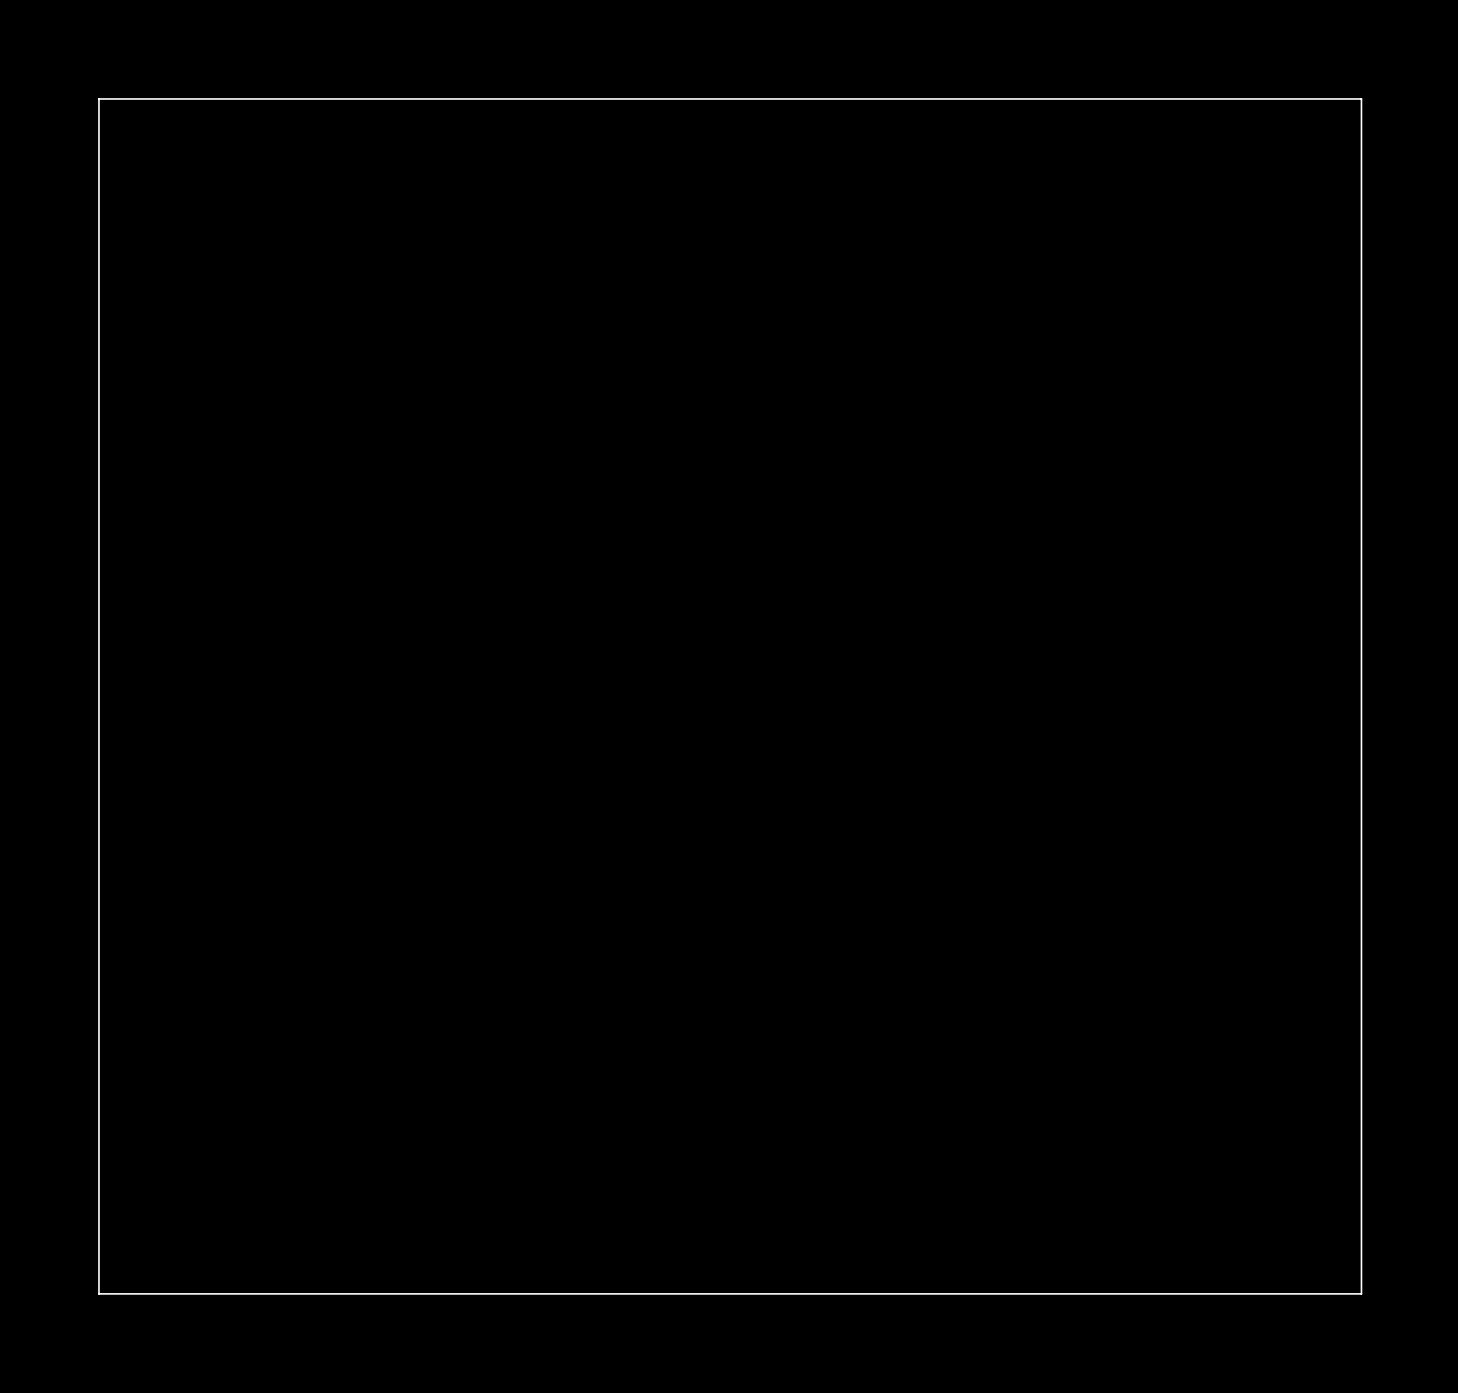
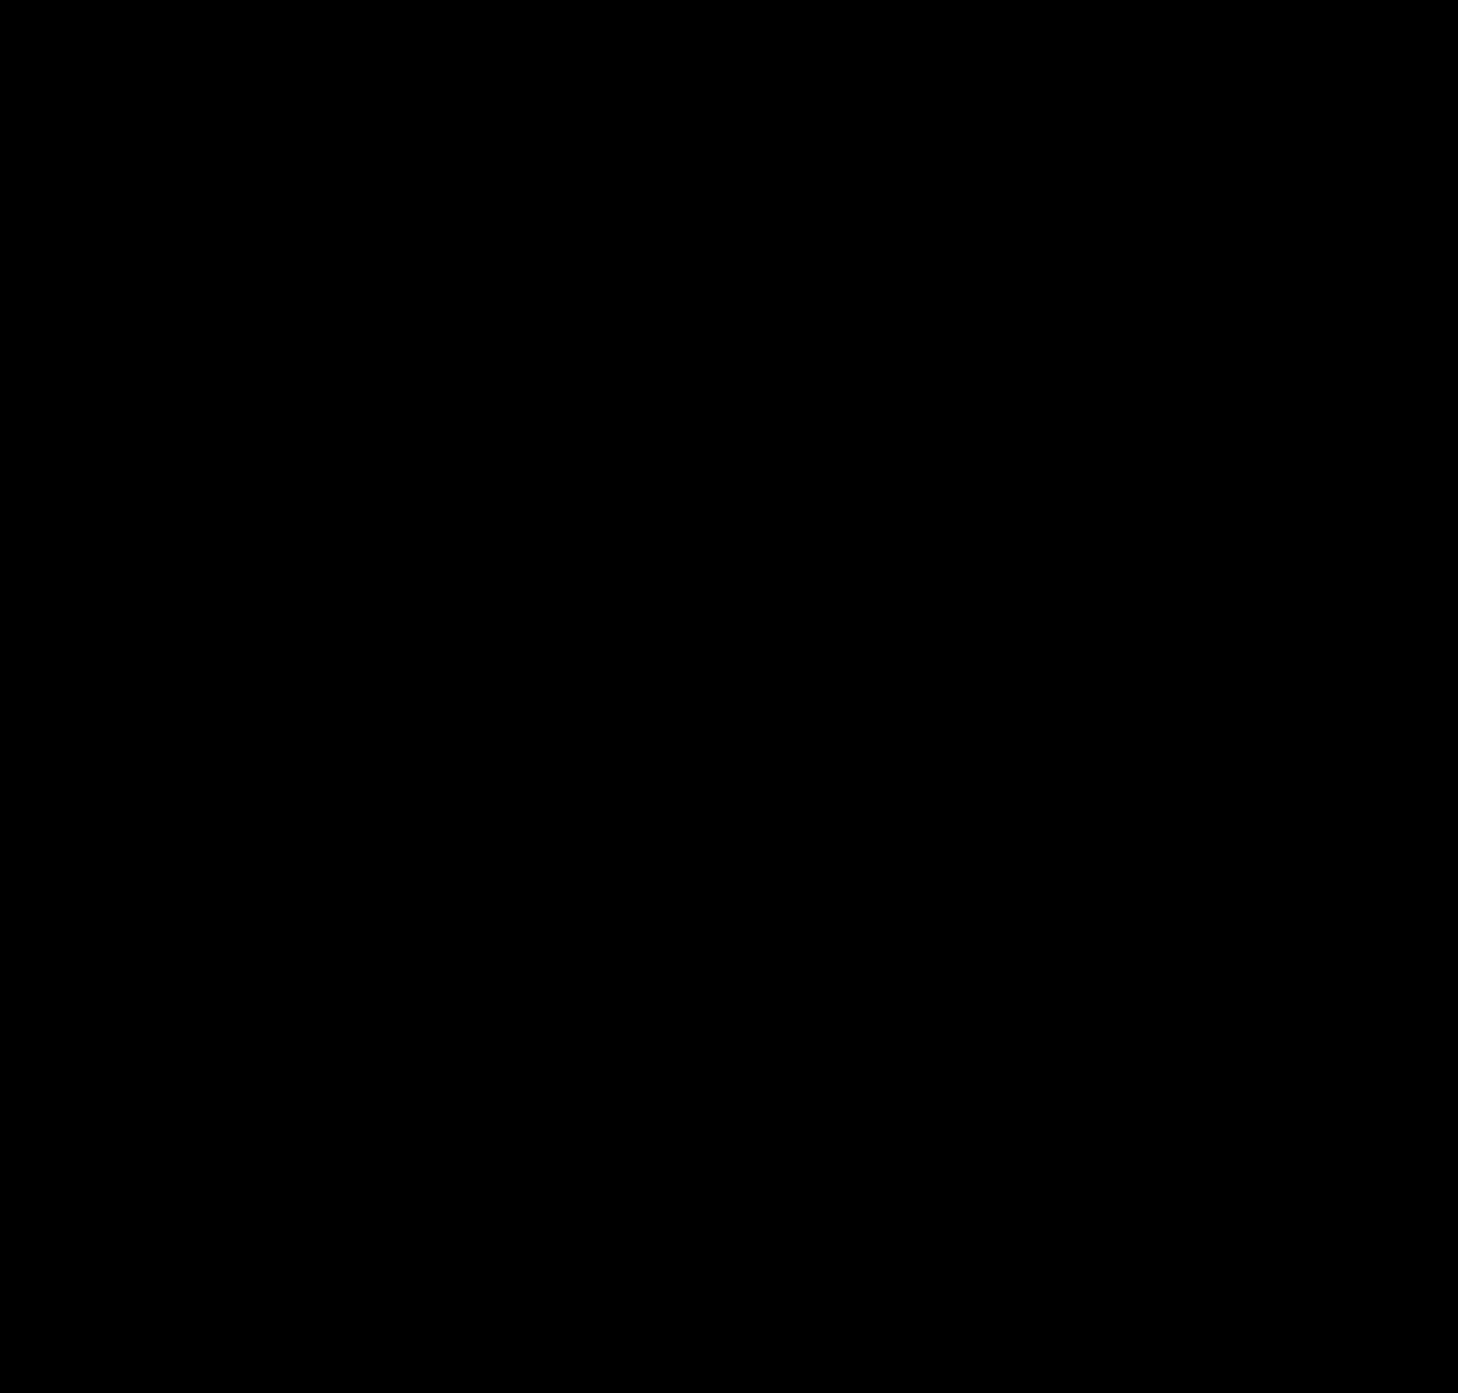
board edge: (1361, 98) (98, 98) (98, 1293) (1361, 1293) (1361, 98) -> none

